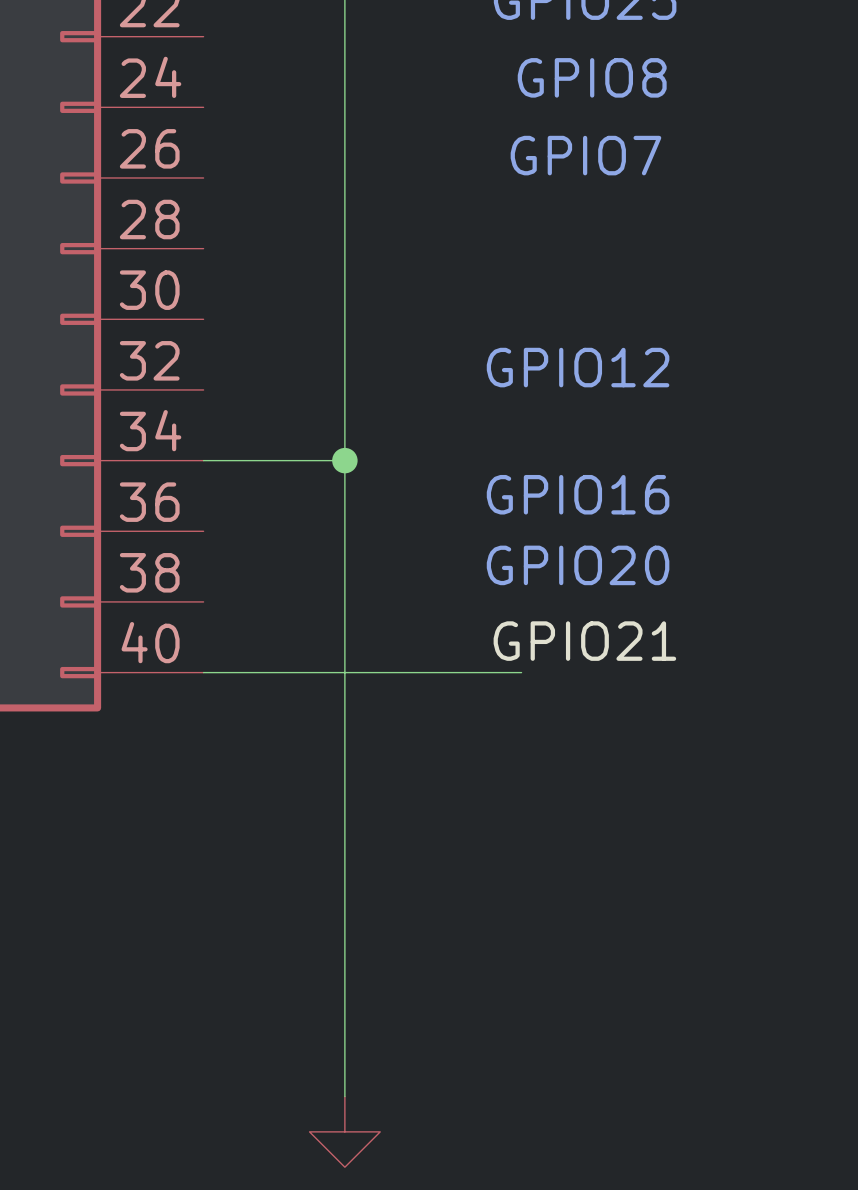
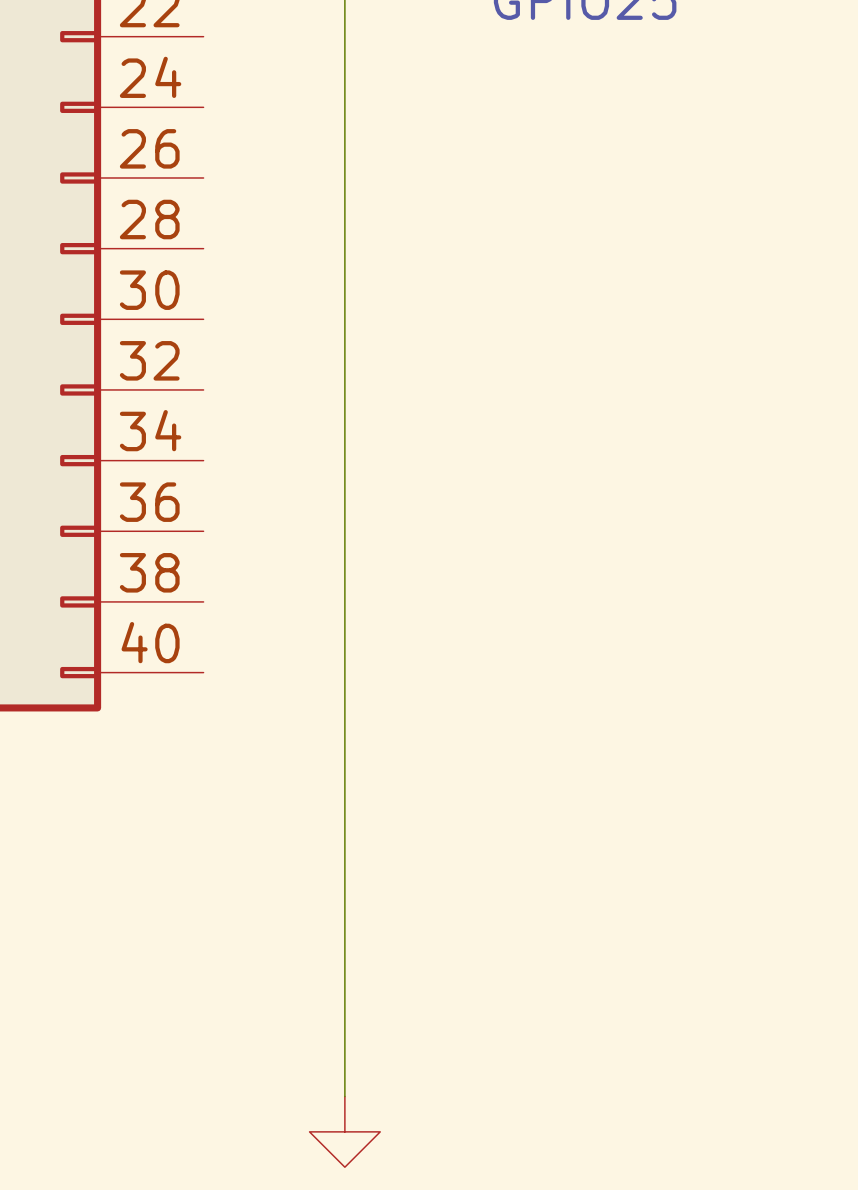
text: GPIO8 (592, 77) -> none
text: GPIO7 (585, 155) -> none
text: GPIO12 (578, 367) -> none
wire: (203, 460) (344, 460) -> none
junction: (344, 460) -> none
text: GPIO16 (578, 494) -> none
text: GPIO20 (578, 565) -> none
label: GPIO21 (584, 641) -> none
wire: (203, 672) (521, 672) -> none

